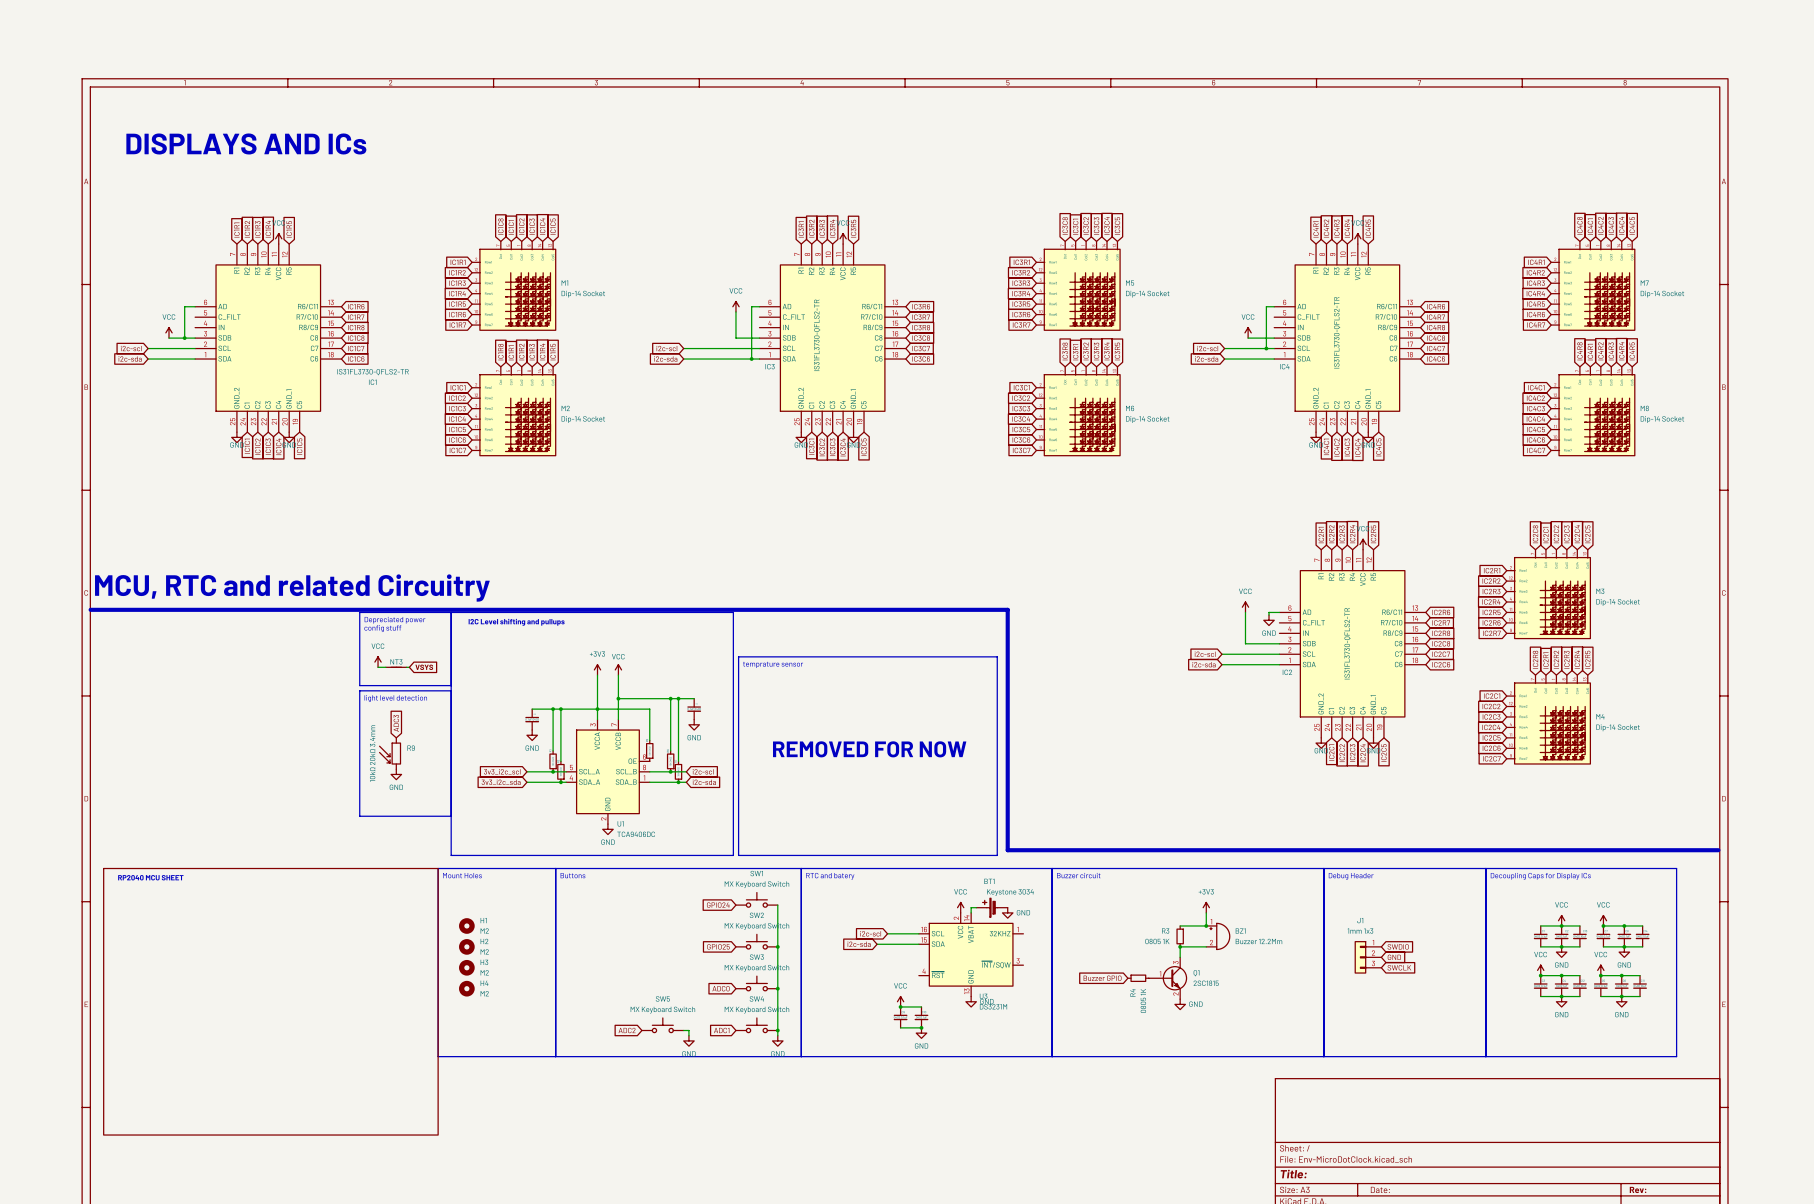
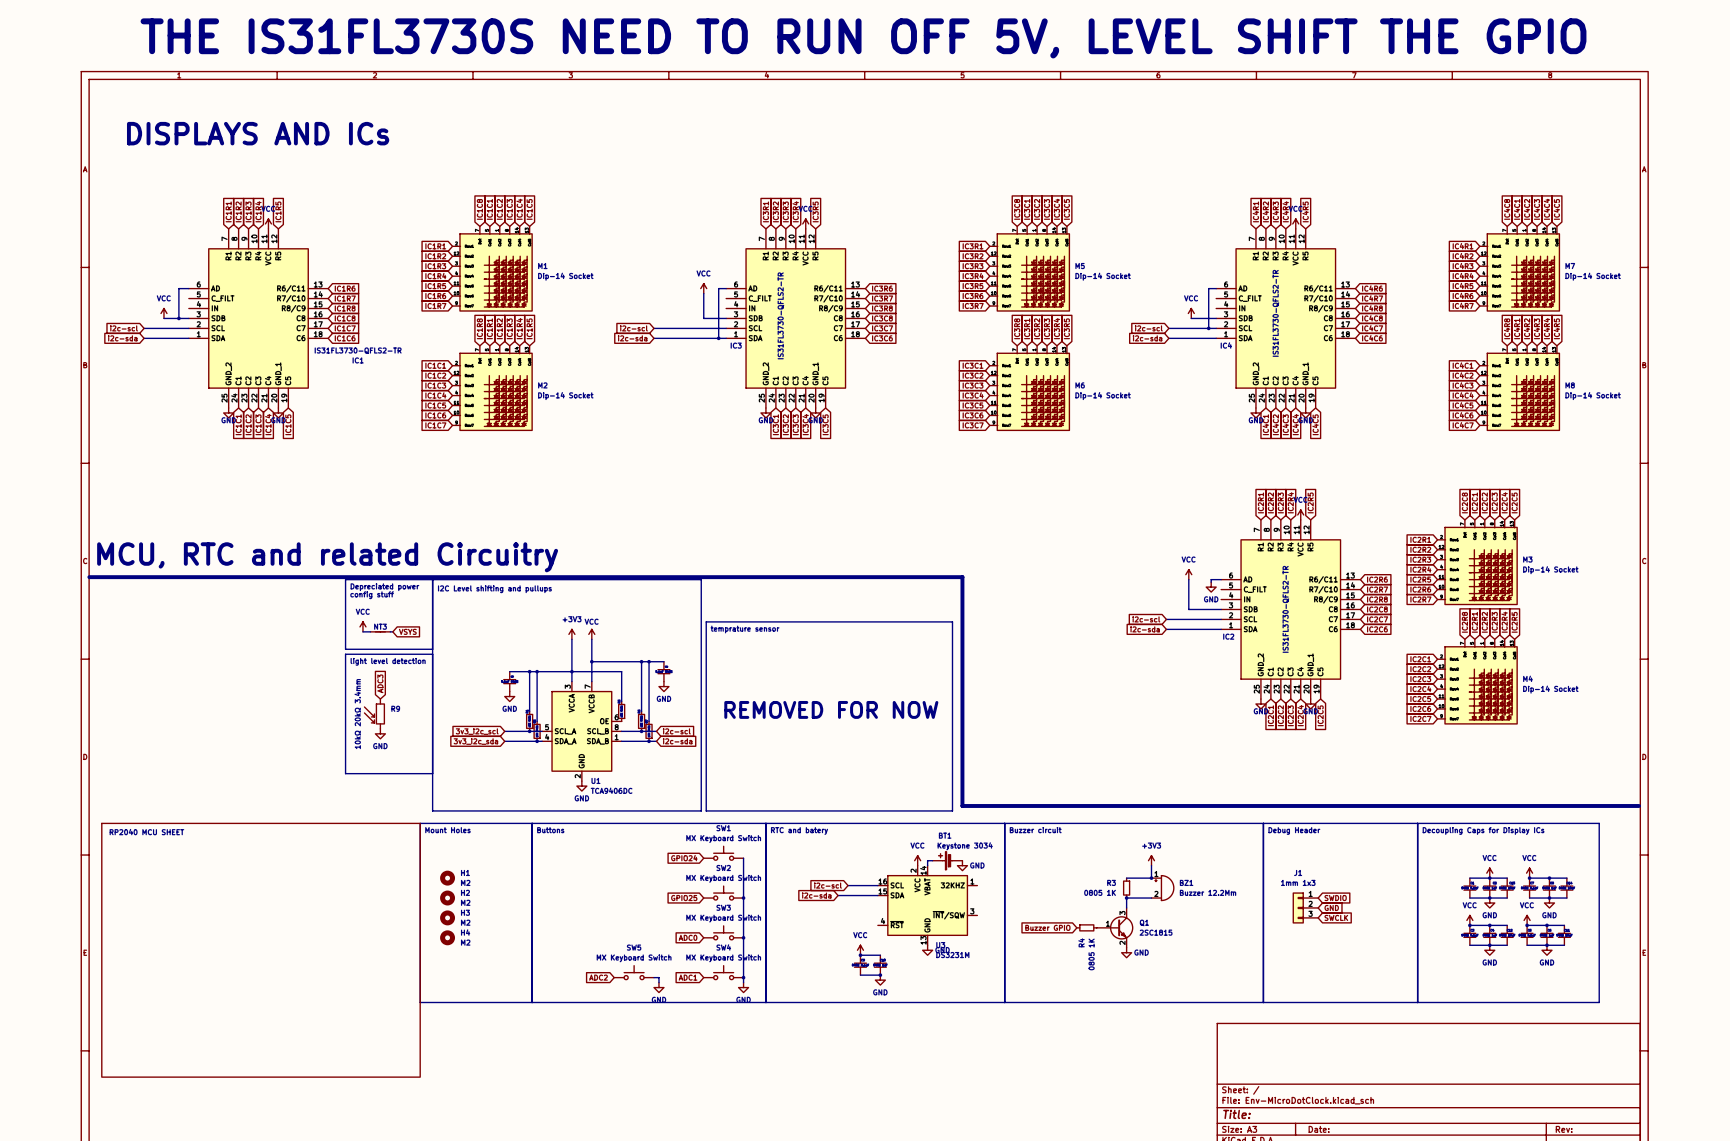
text: none -> THE IS31FL3730S NEED TO RUN OFF 5V, LEVEL SHIFT THE GPIO (863, 38)

